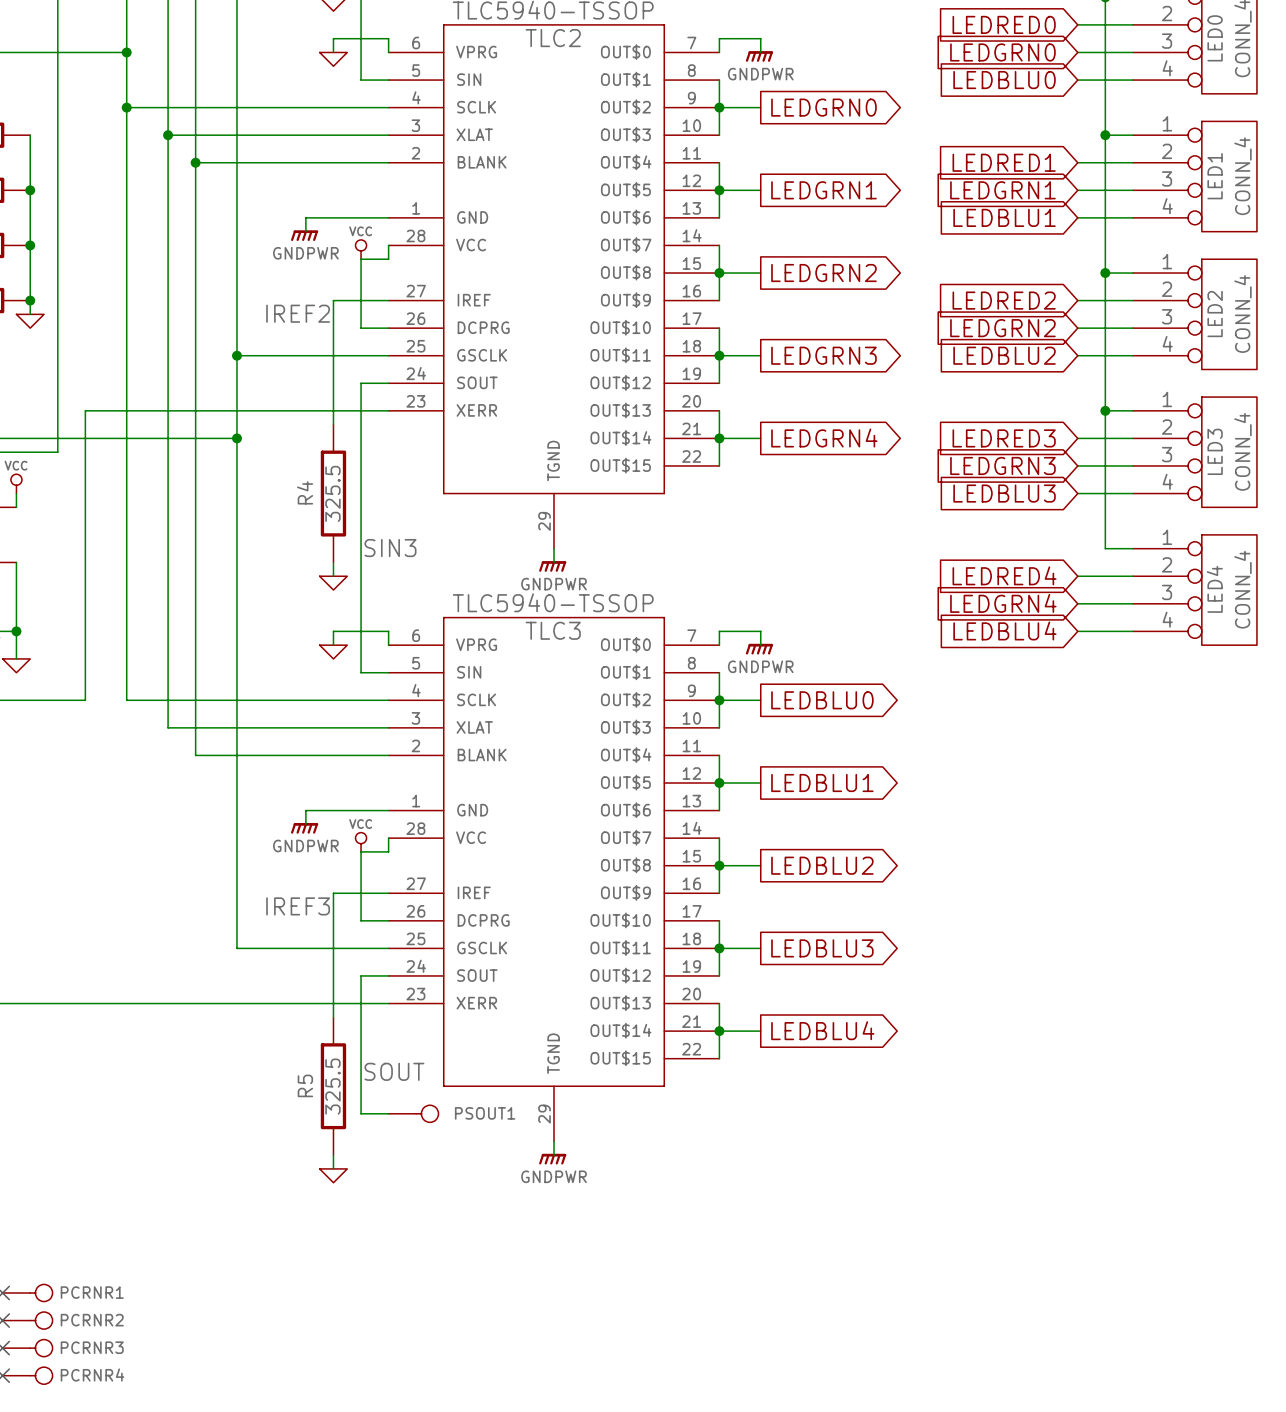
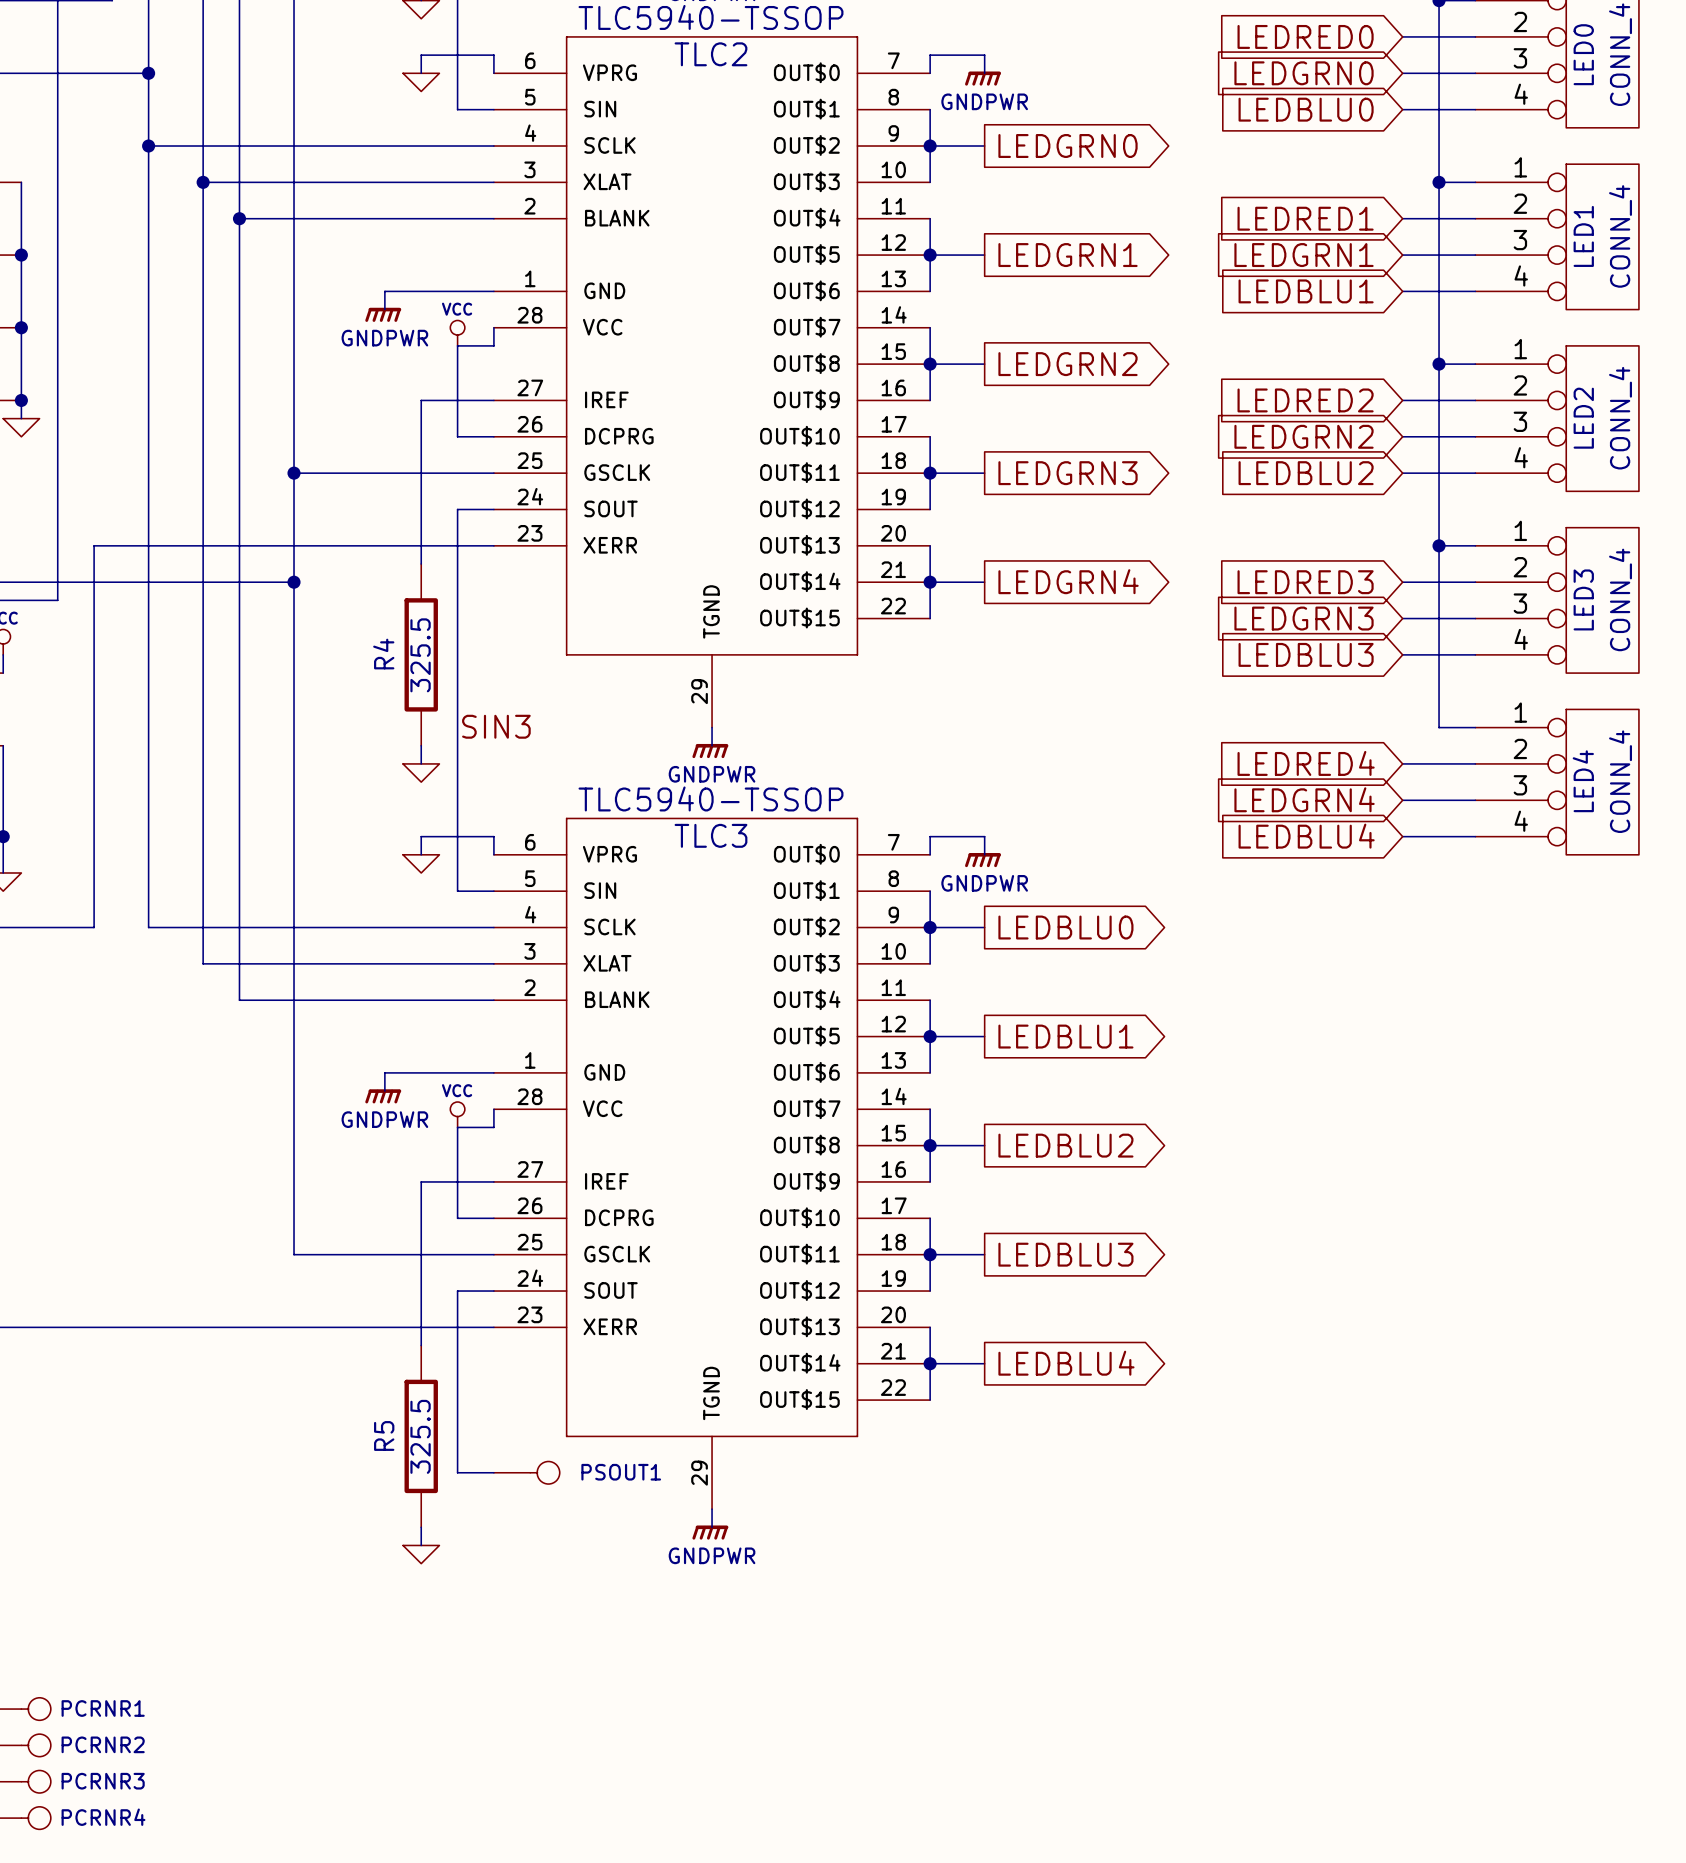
label: IREF2 (298, 313) -> none
label: IREF3 (298, 906) -> none
label: SOUT (394, 1071) -> none

